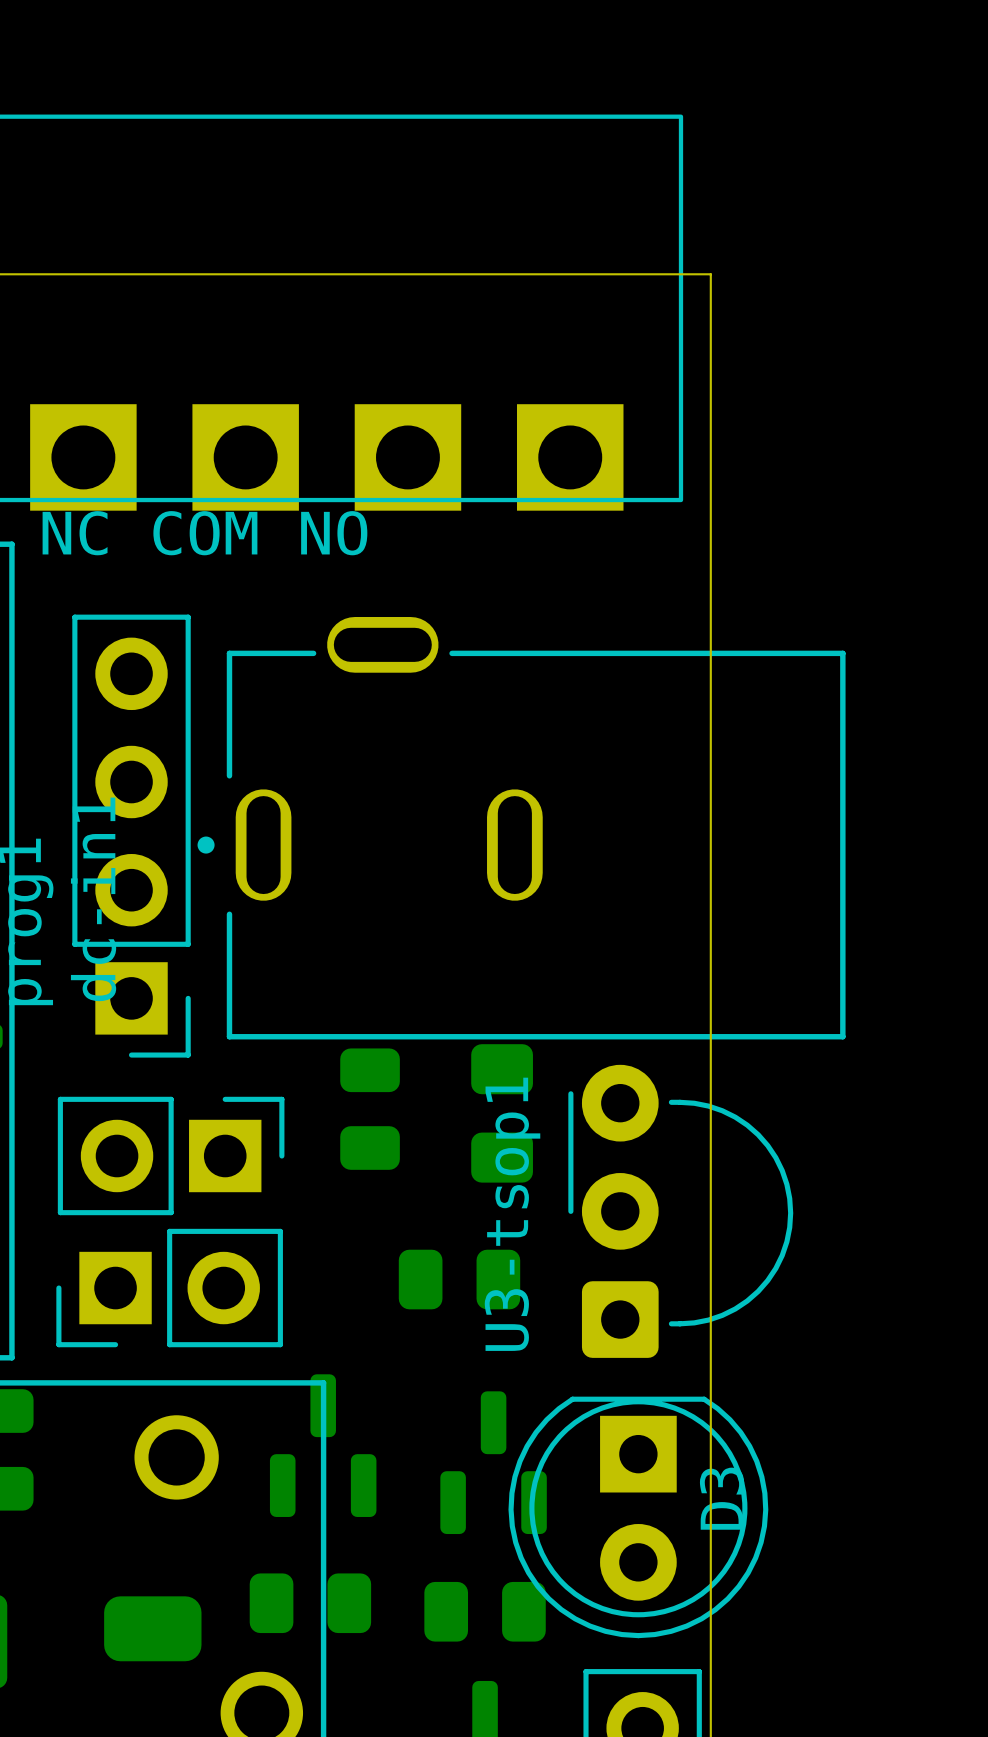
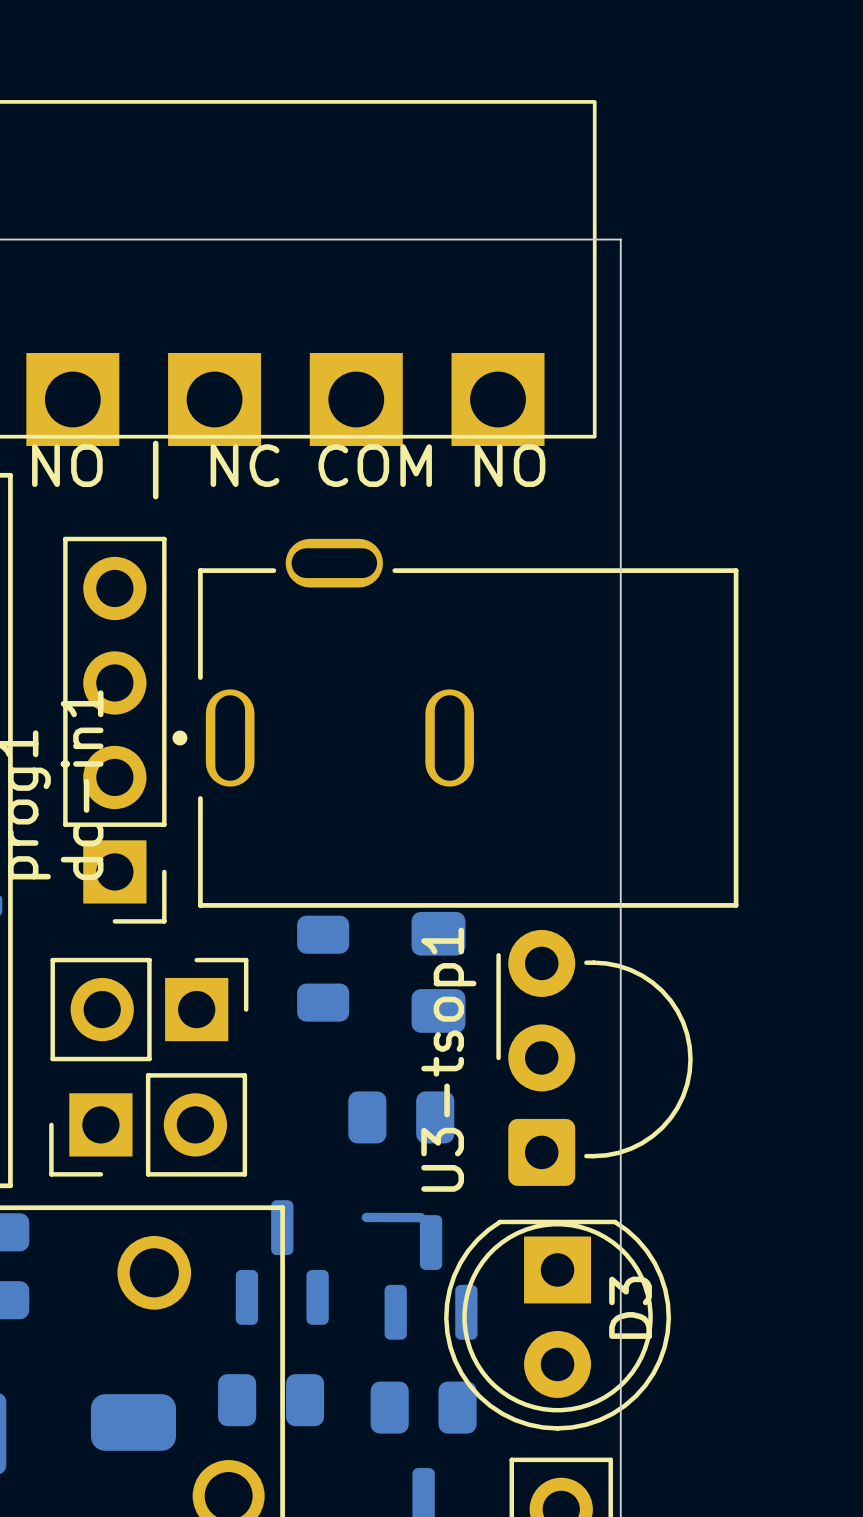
bottom track: none -> (366, 1217) (420, 1217)

